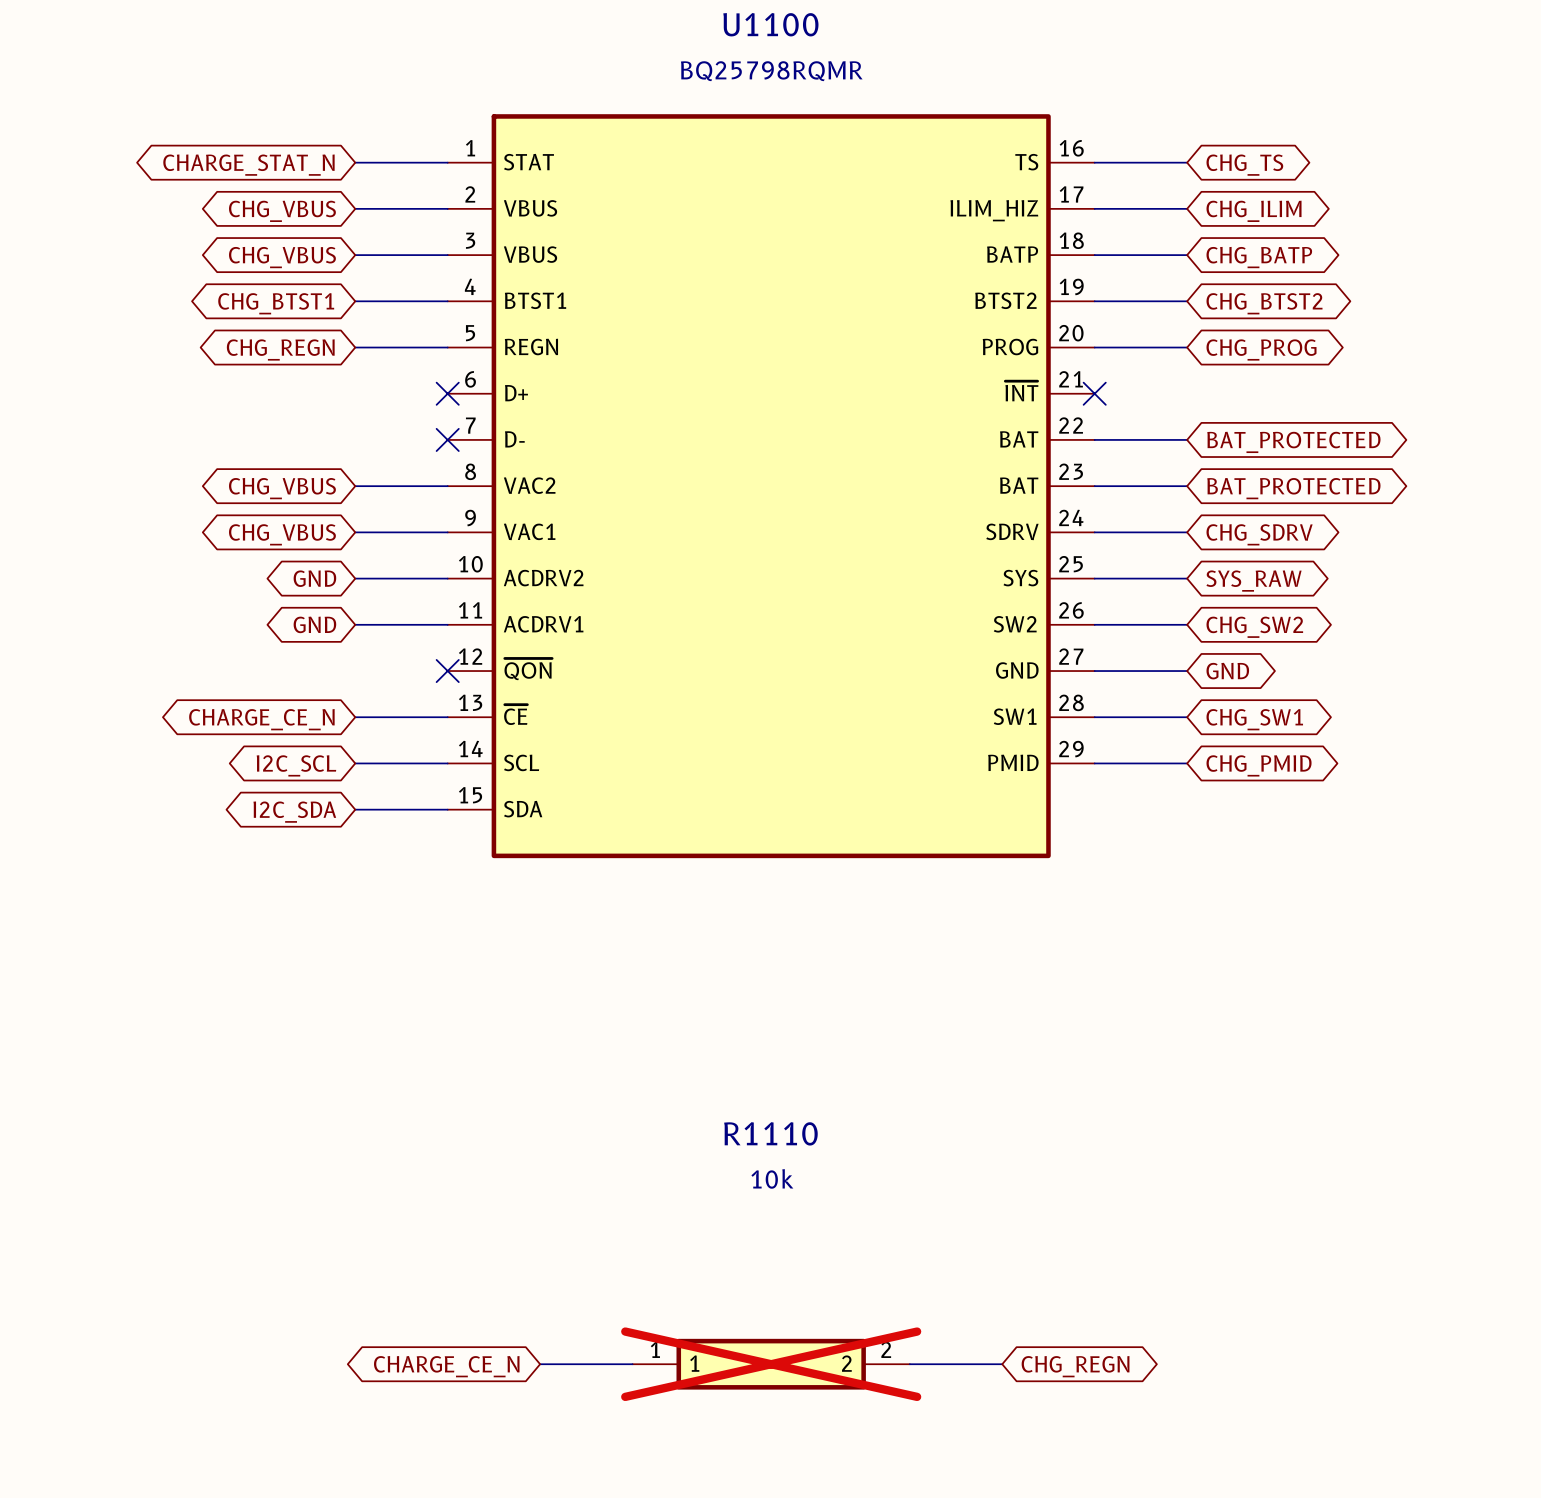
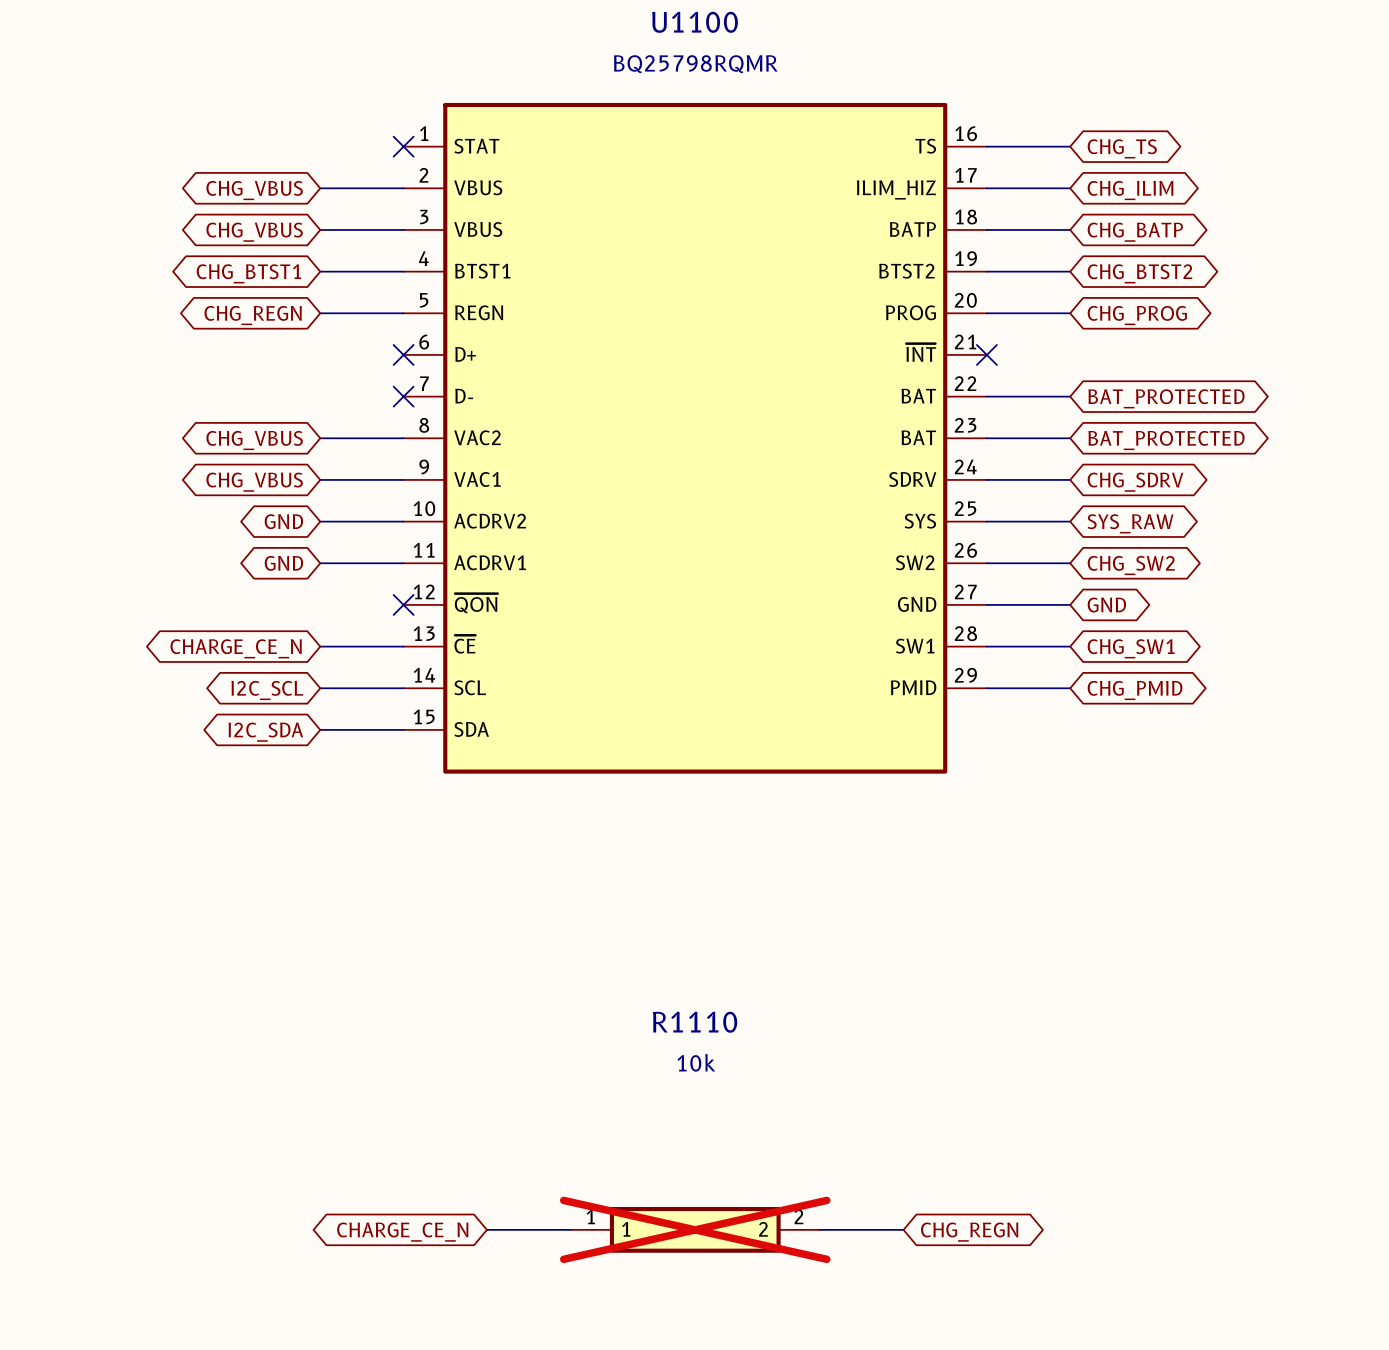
wire: (355, 162) (447, 162) -> none
no-connect mark: none -> (403, 146)
global label: CHARGE_STAT_N (248, 165) -> none

